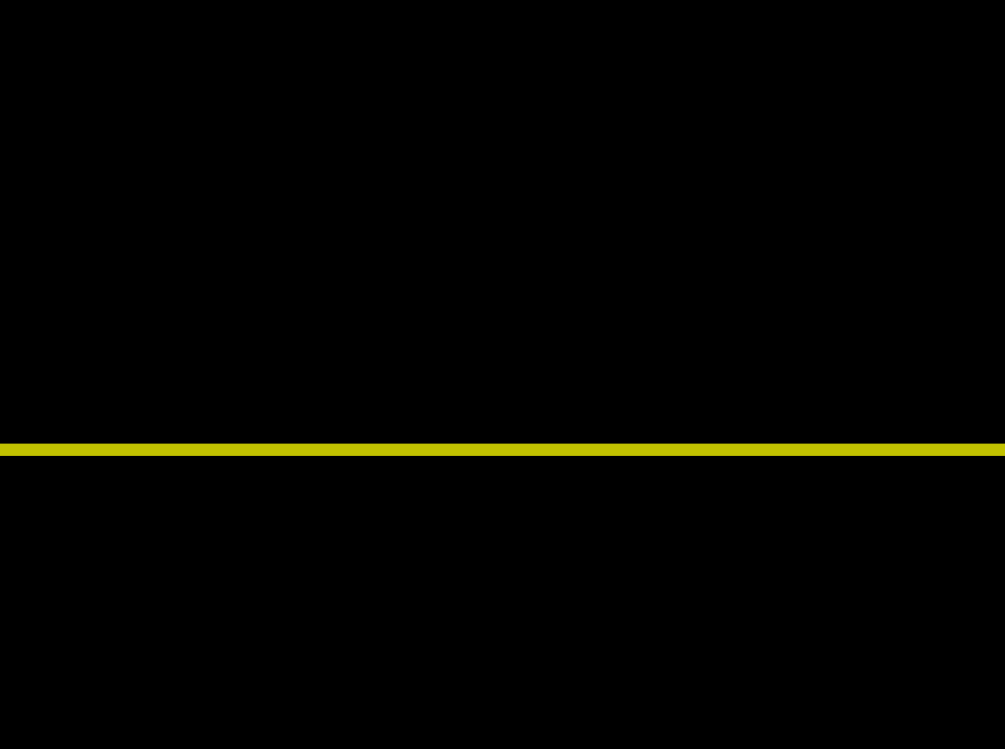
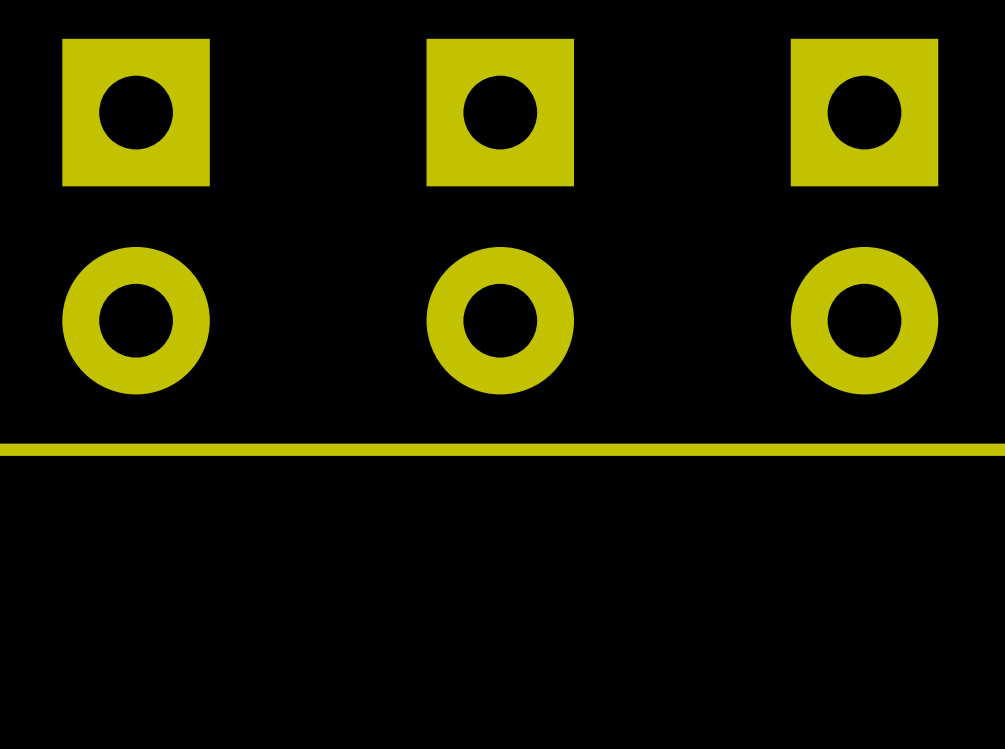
part: none -> (136, 216)
part: none -> (500, 216)
part: none -> (864, 216)

